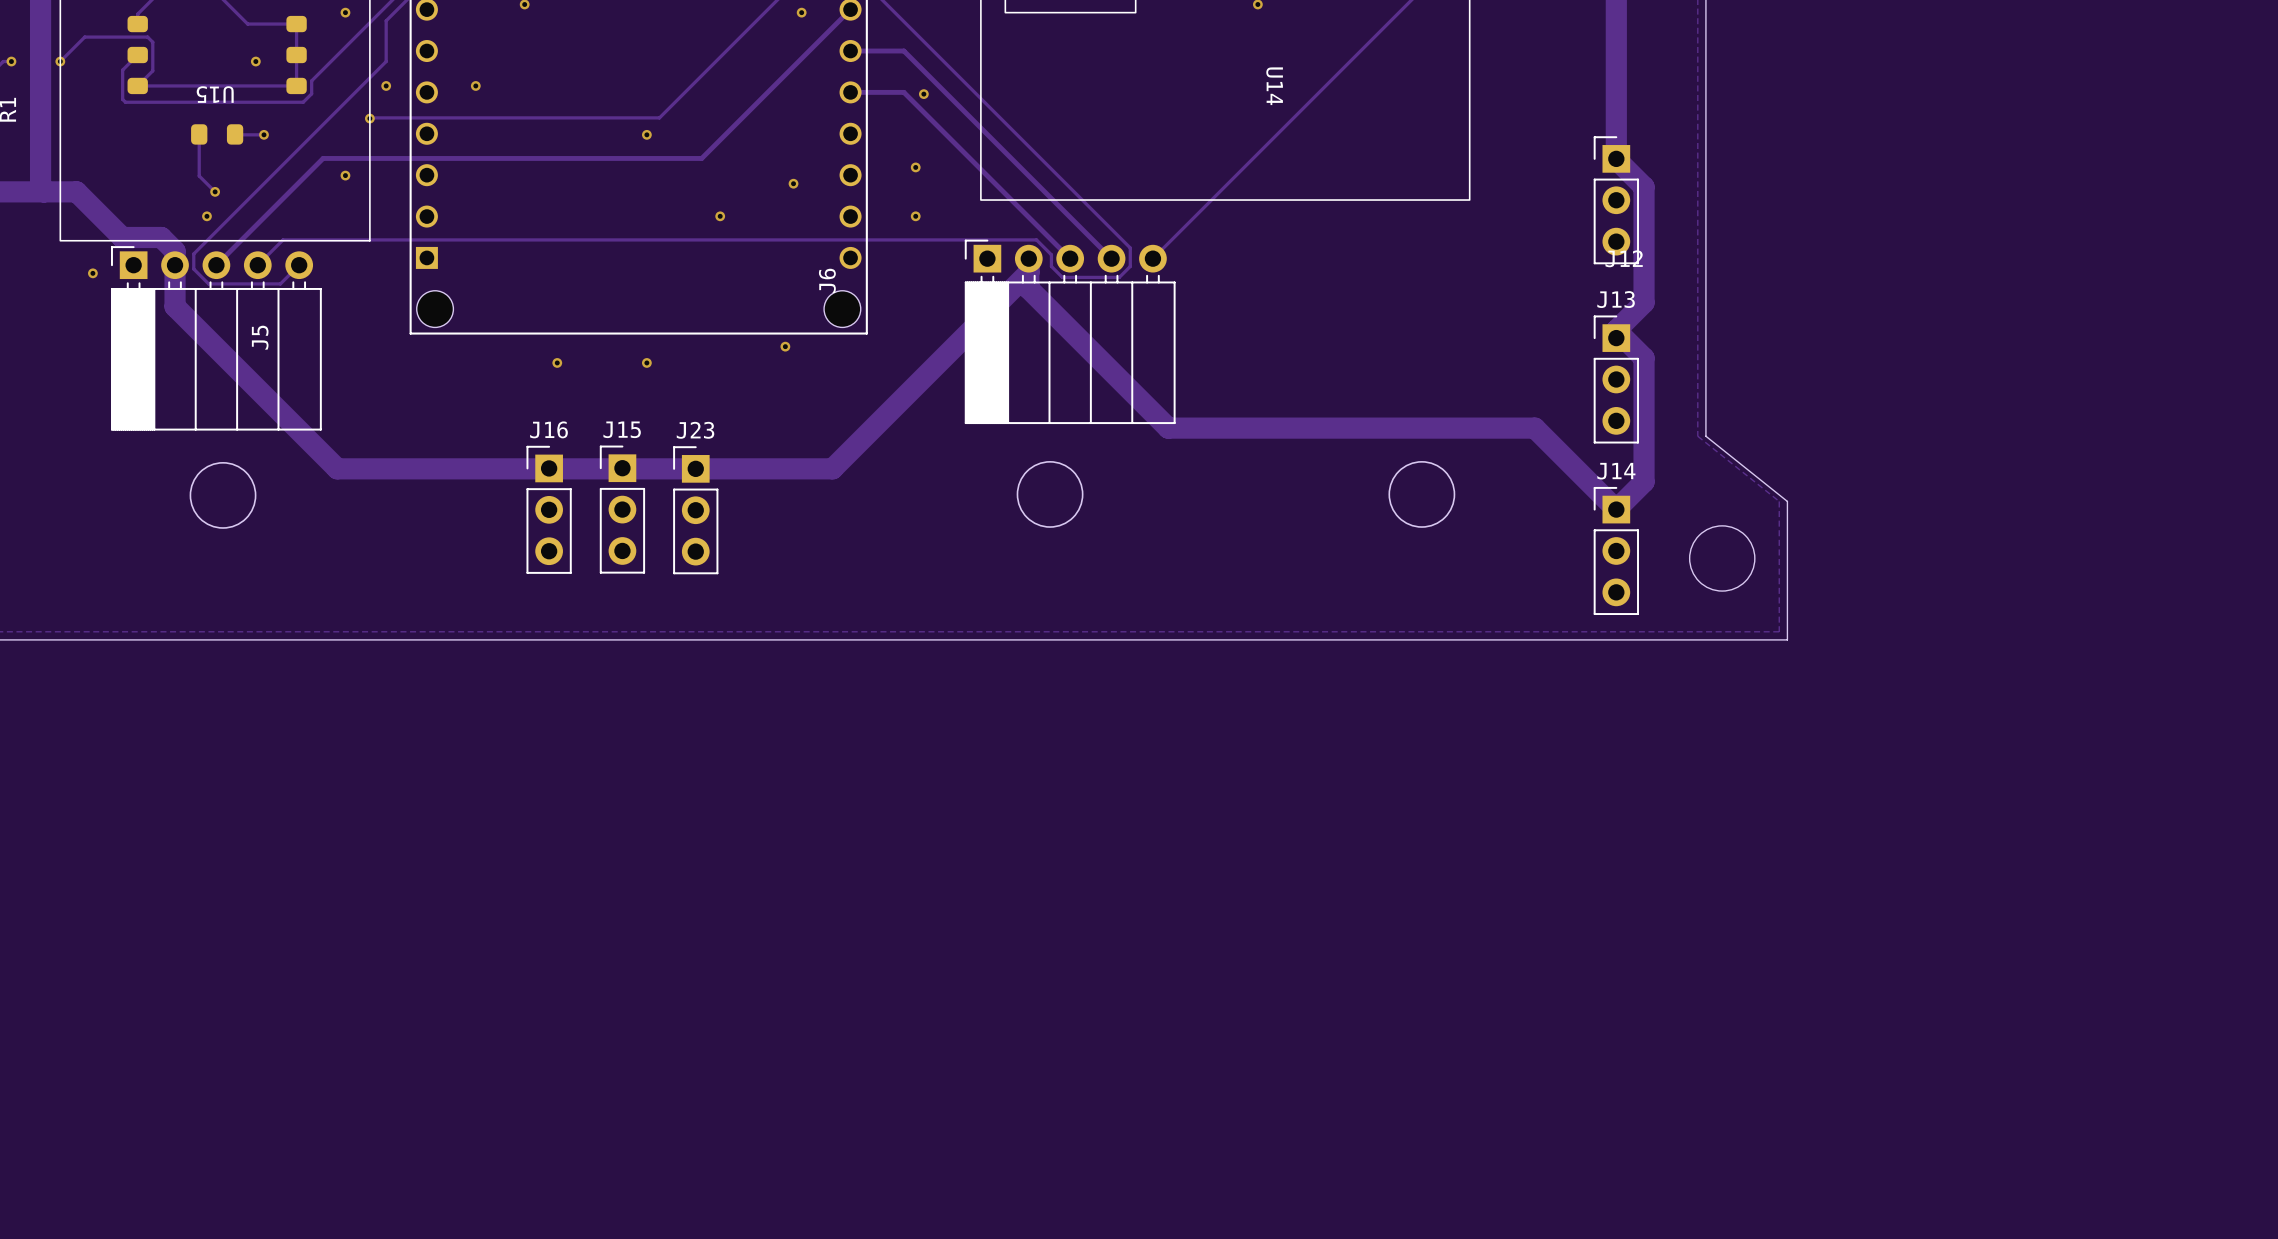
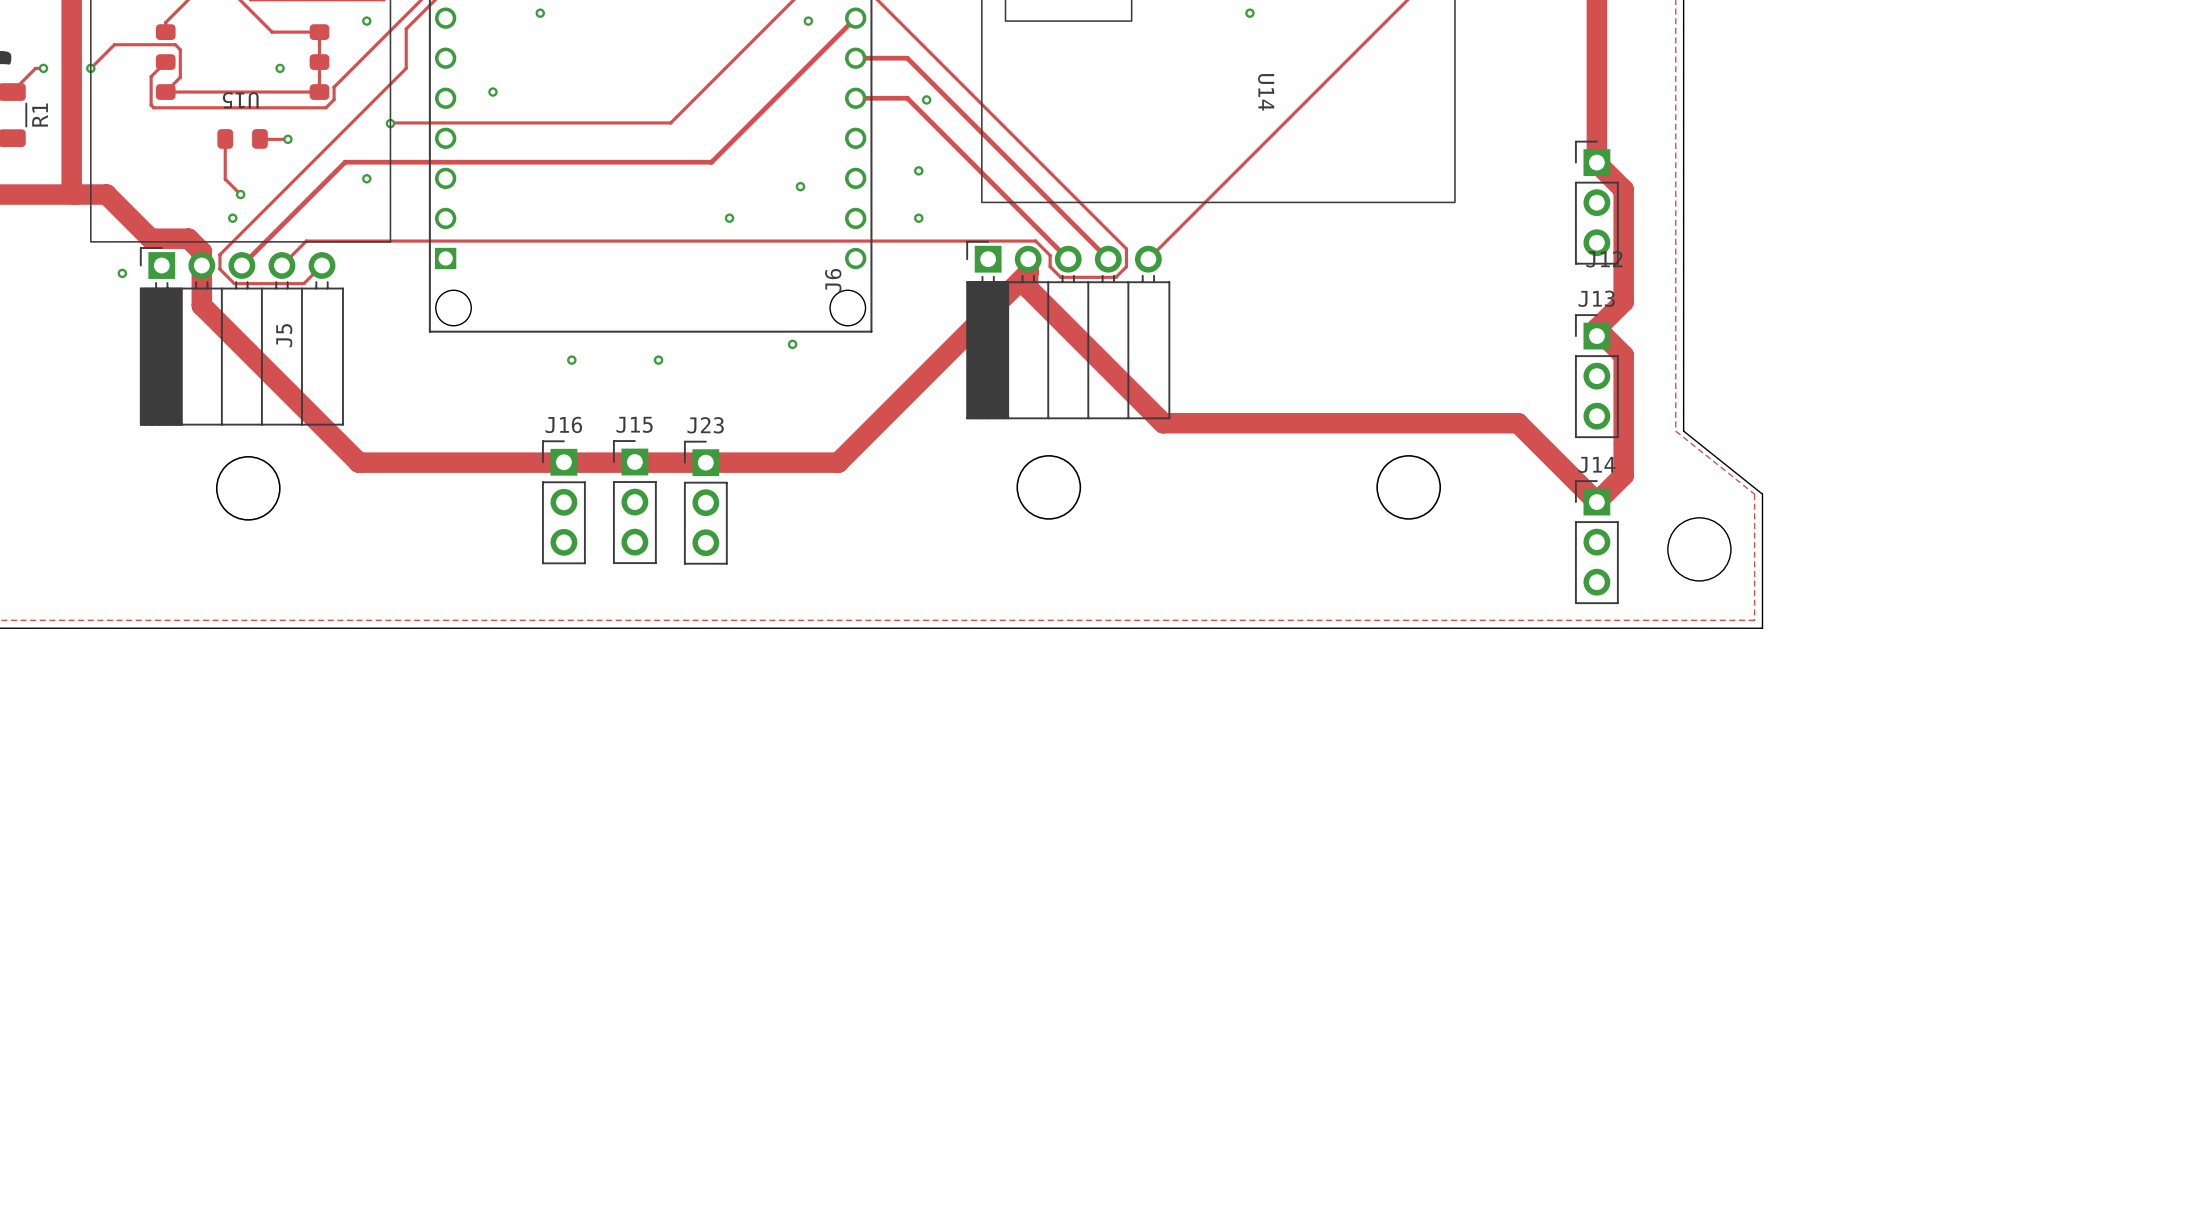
via: (386, 85) -> none
via: (646, 134) -> none

